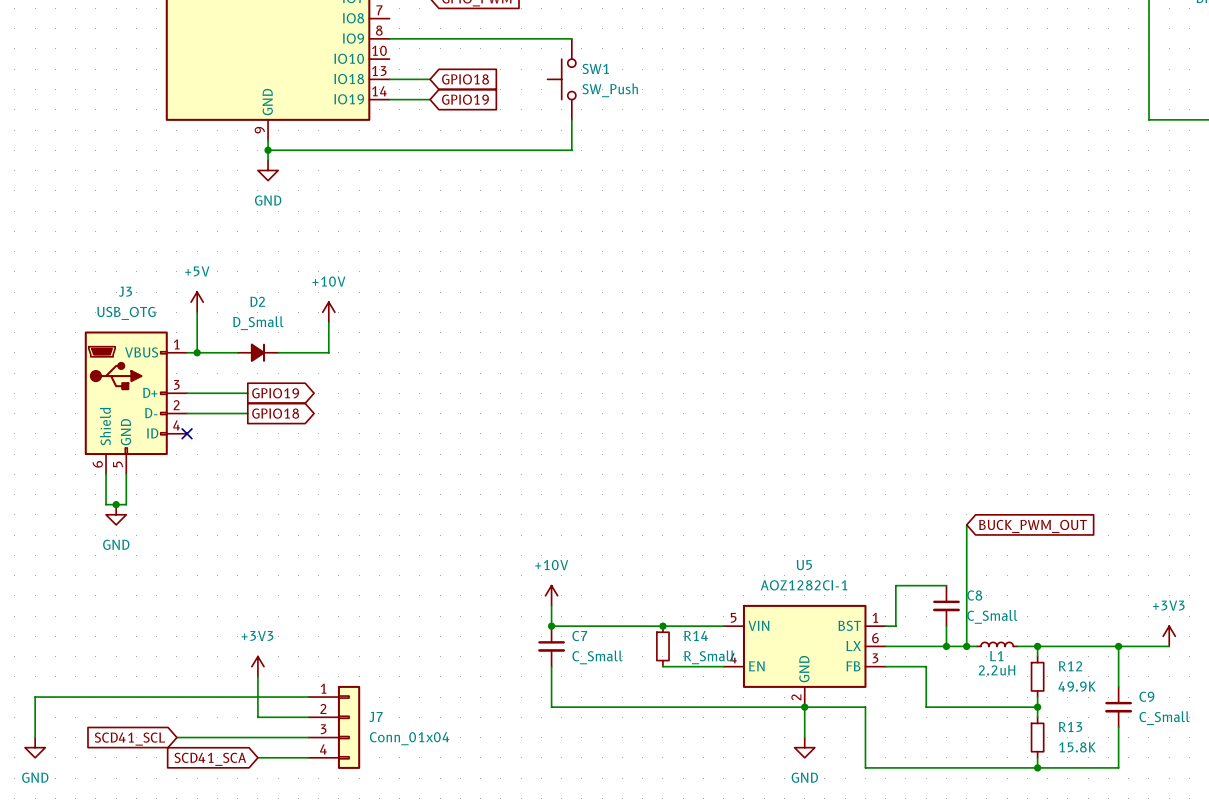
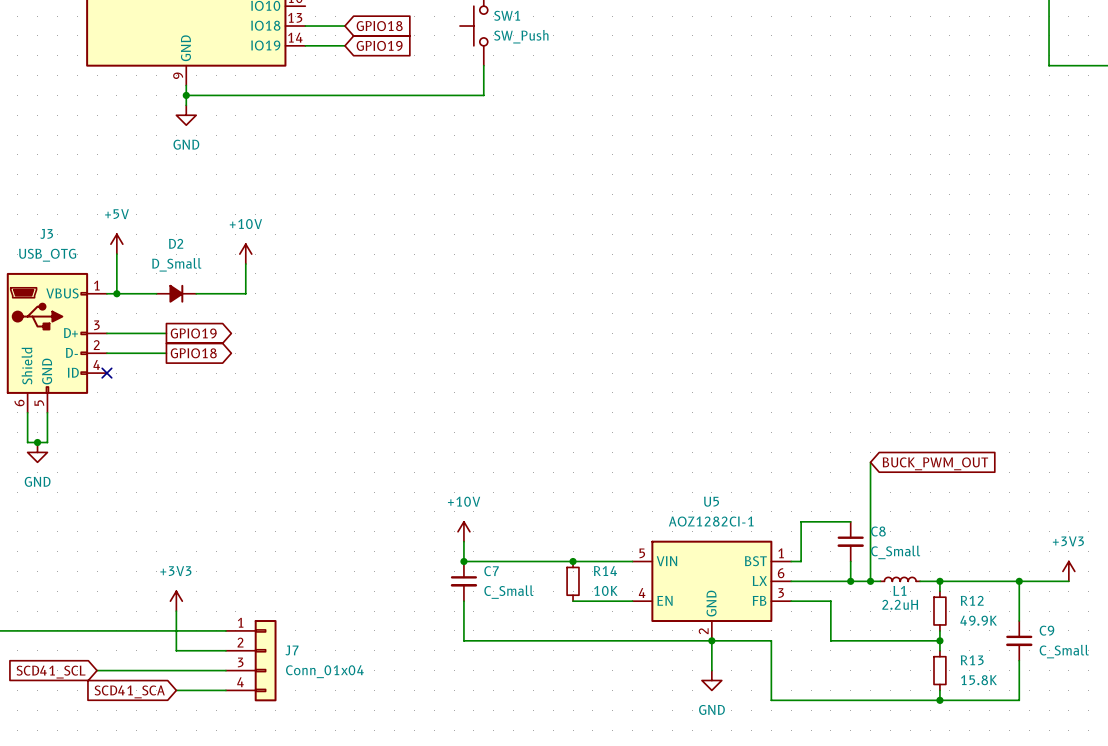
R14 value: R_Small (709, 657) -> 10K (605, 590)

